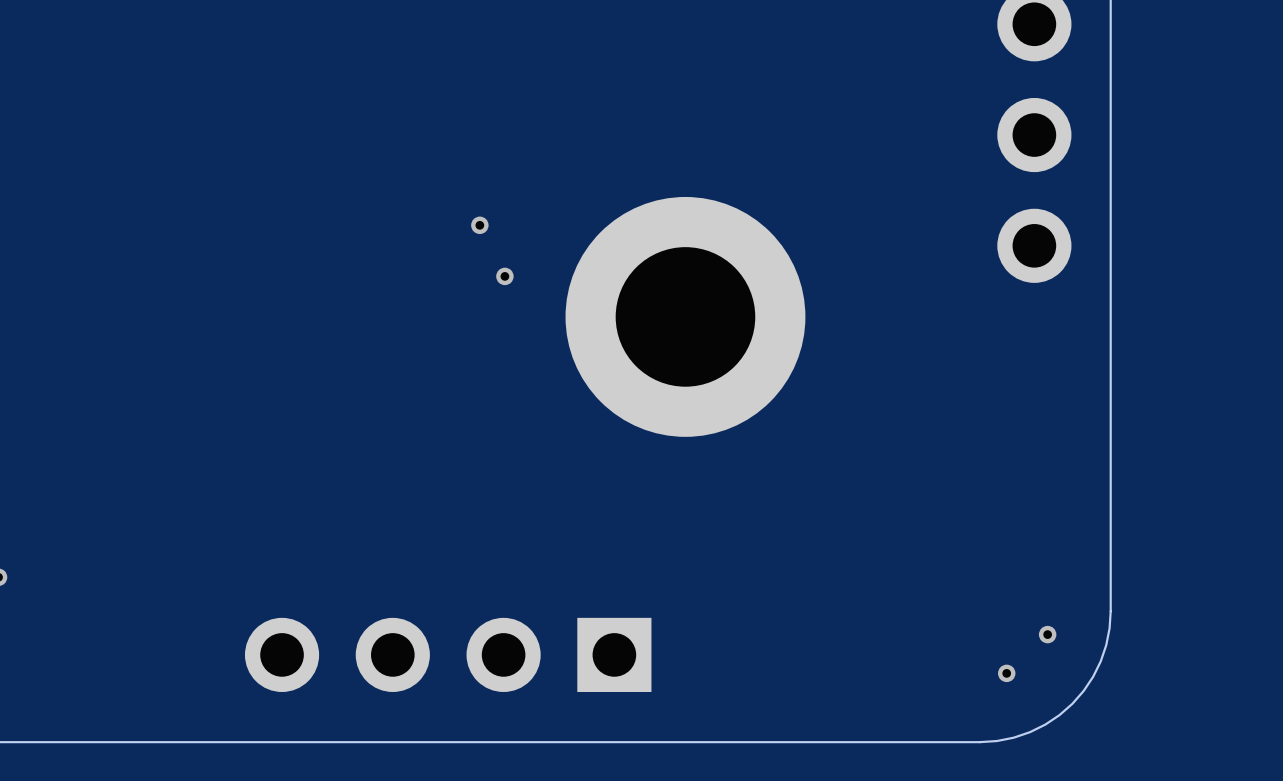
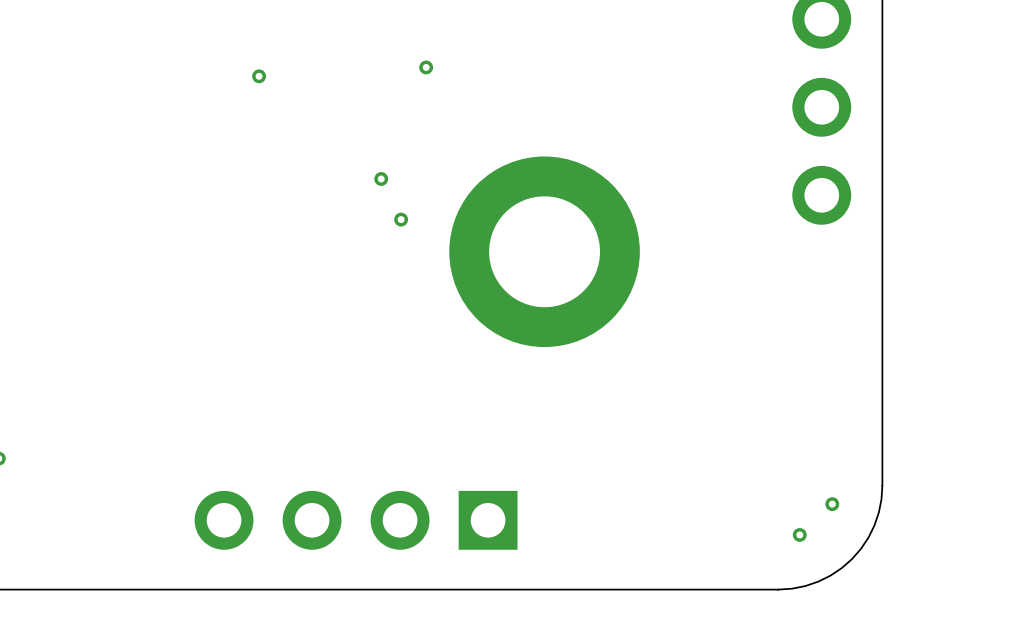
via: none -> (426, 67)
via: none -> (259, 76)

